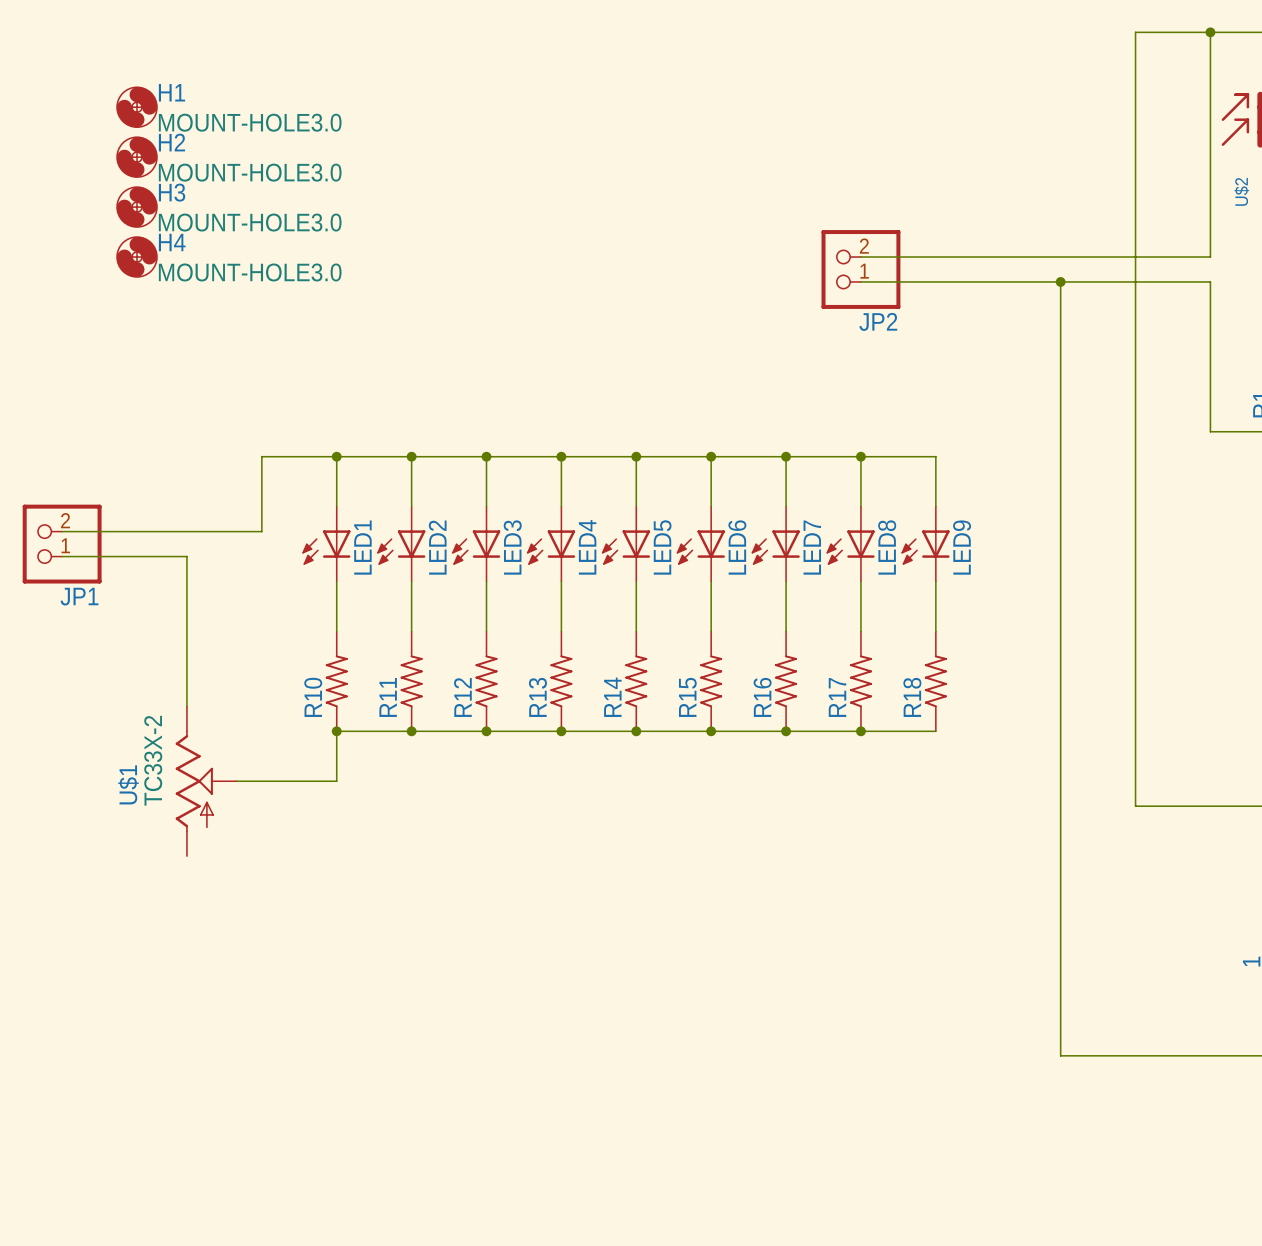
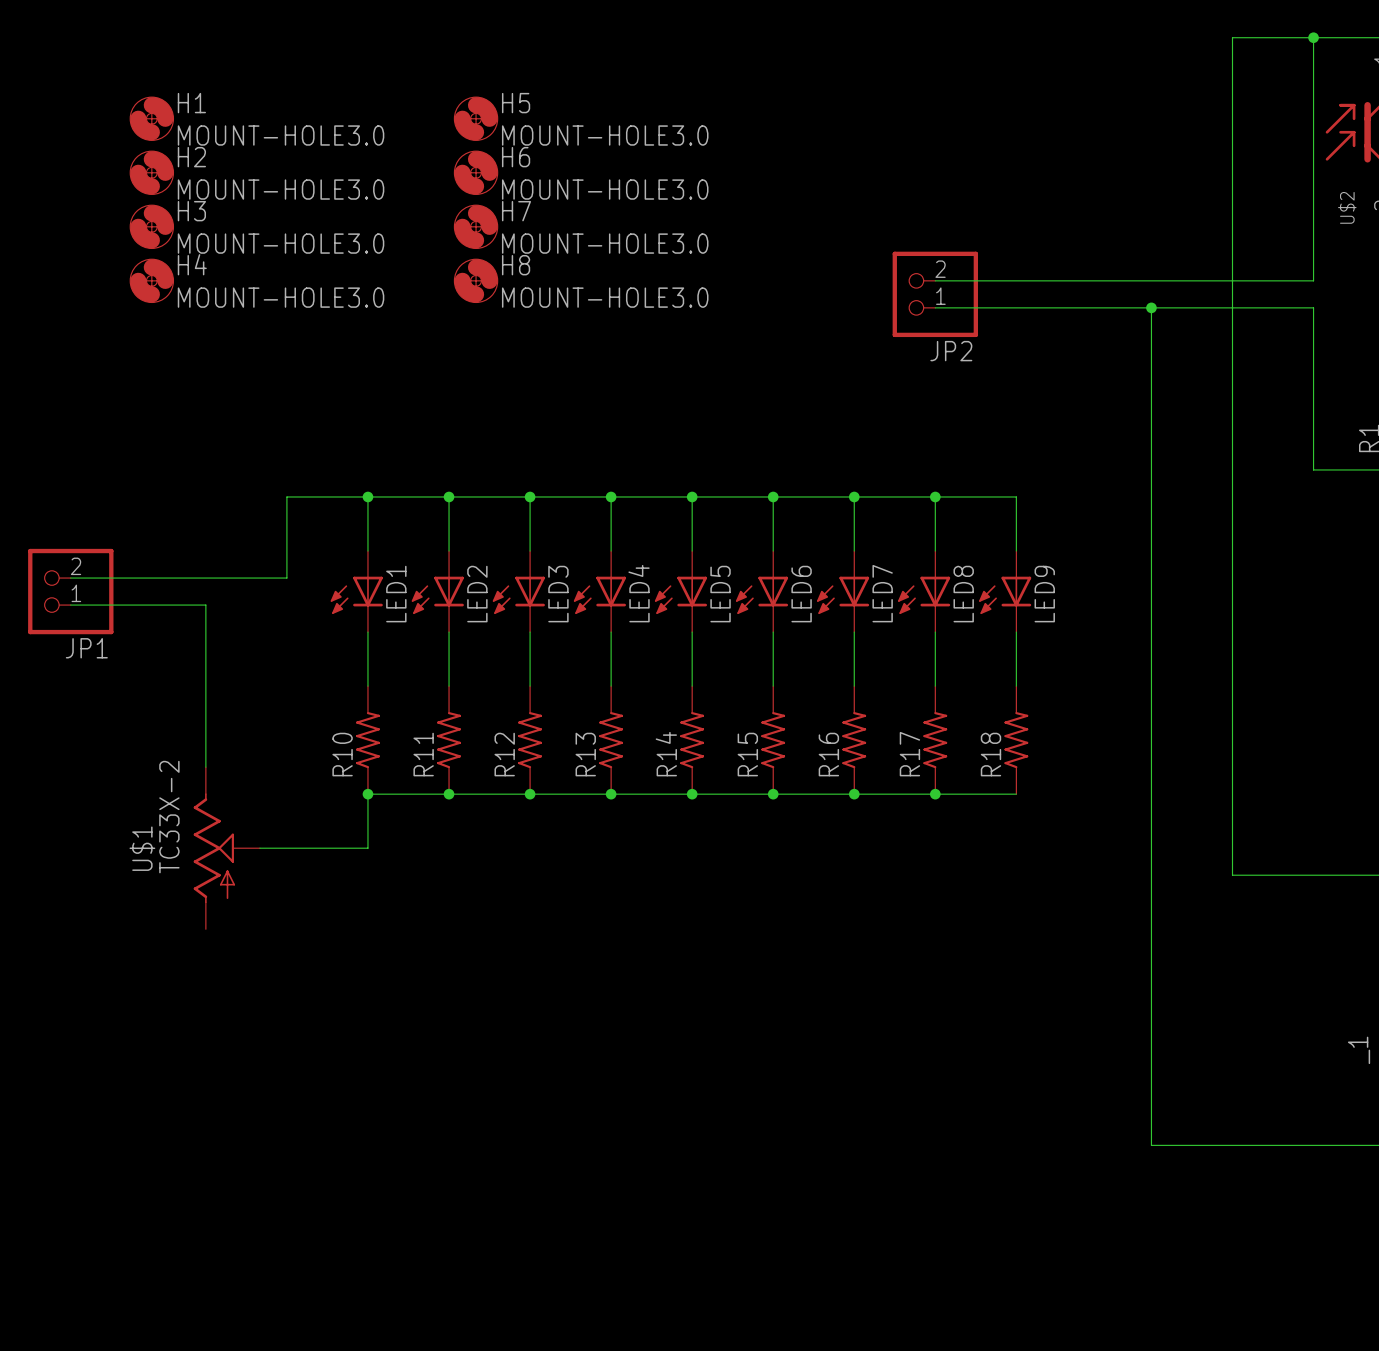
H5: none -> MOUNT-HOLE3.0 (476, 118)
H6: none -> MOUNT-HOLE3.0 (476, 172)
H7: none -> MOUNT-HOLE3.0 (476, 226)
H8: none -> MOUNT-HOLE3.0 (476, 280)

